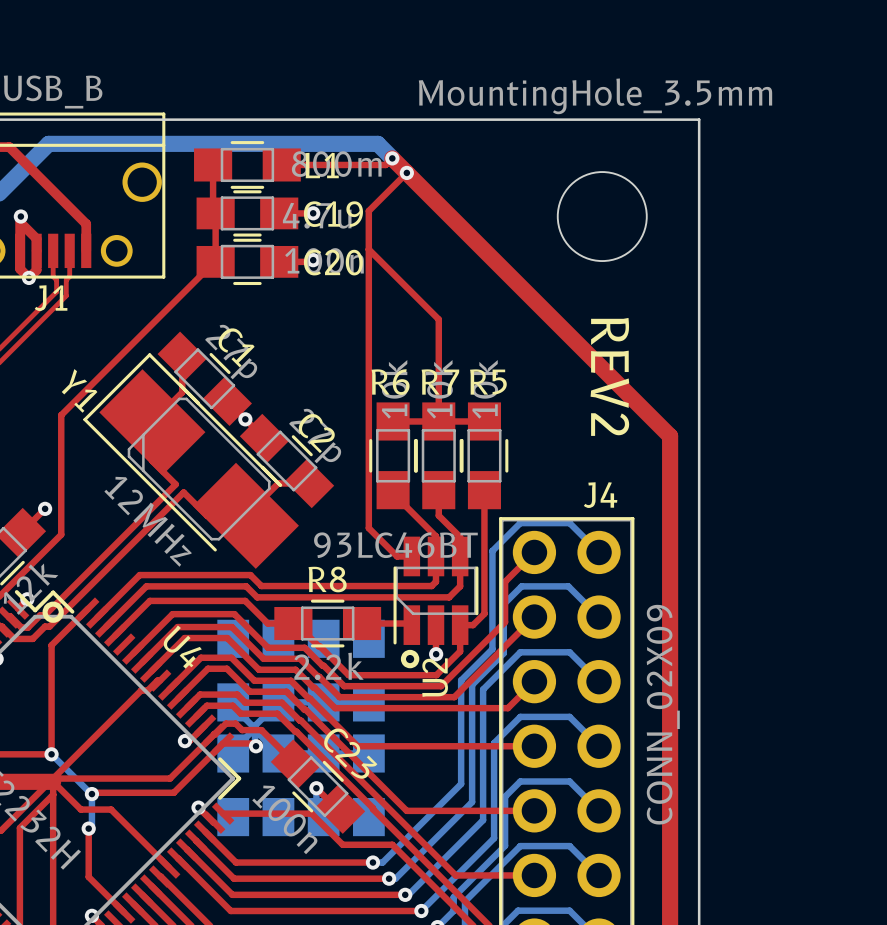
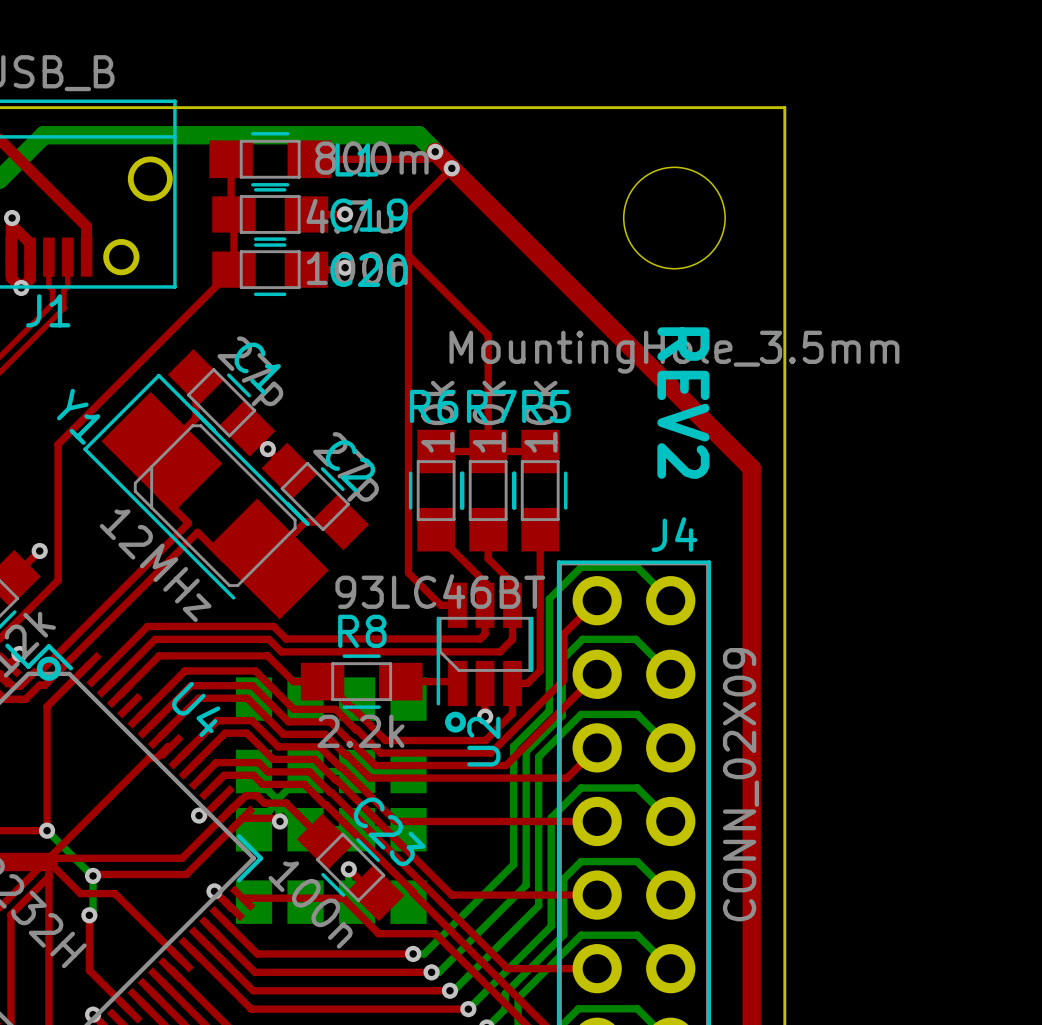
part value position: MountingHole_3.5mm (595, 96) -> MountingHole_3.5mm (674, 352)

